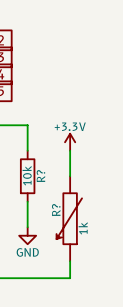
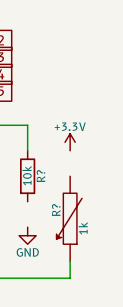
wire: (70, 150) (70, 176) -> none
wire: (27, 201) (27, 227) -> none

